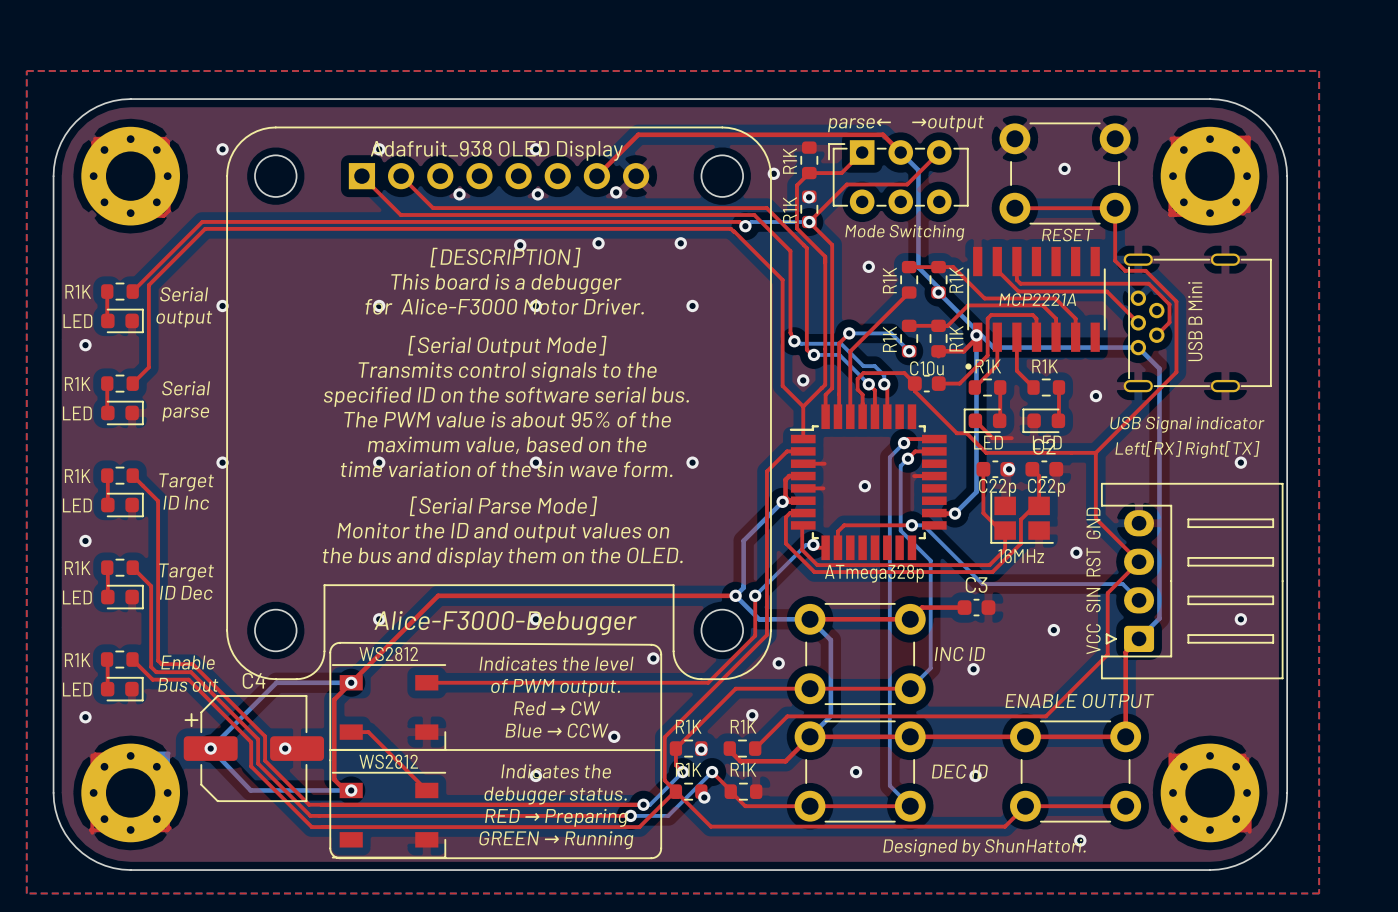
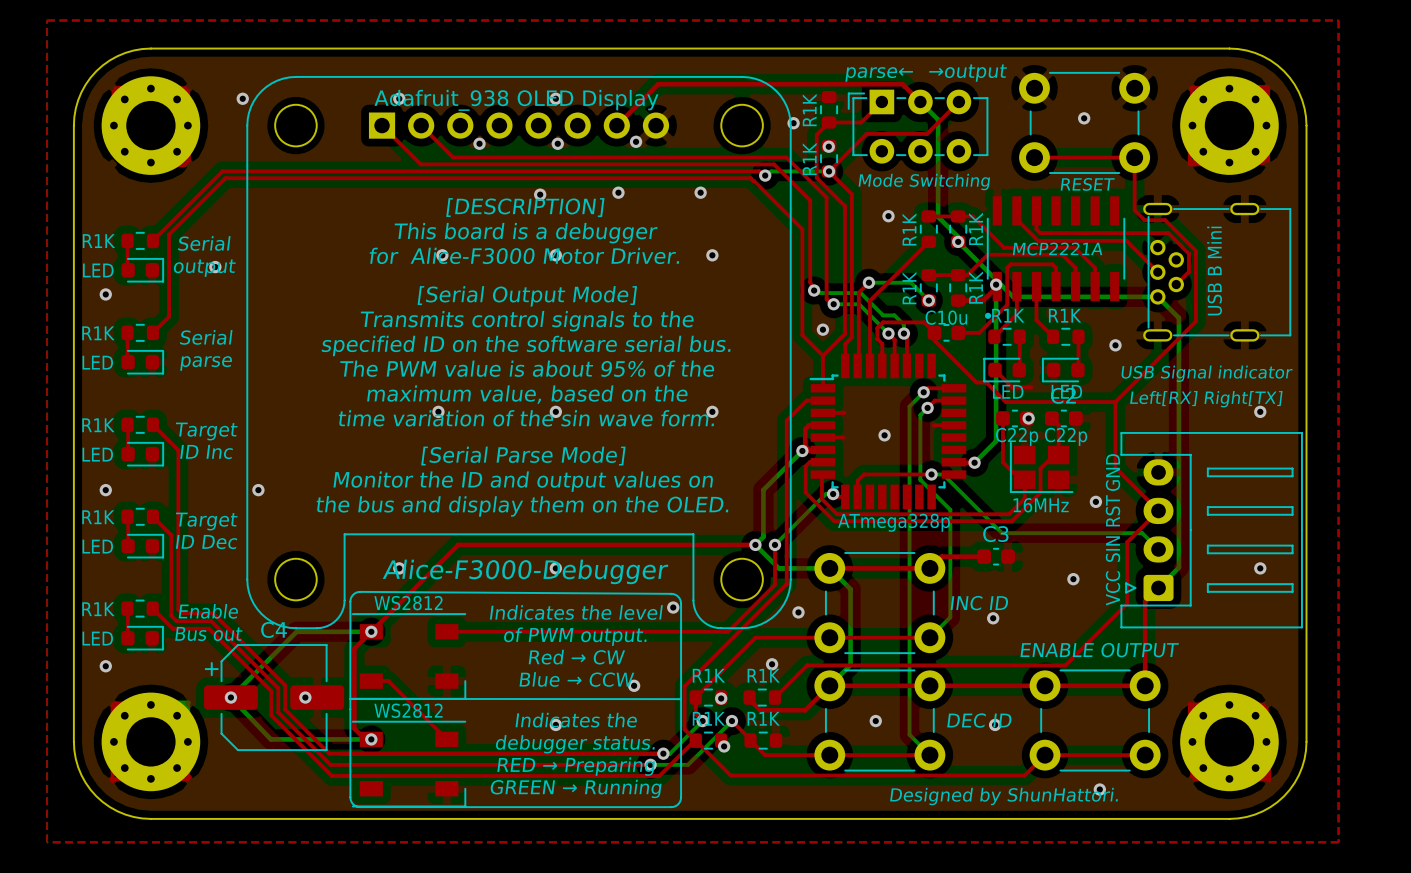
via position: (222, 305) -> (215, 267)
via position: (379, 305) -> (442, 255)
via: (222, 462) -> none
via position: (379, 462) -> (438, 411)
via: none -> (258, 490)

